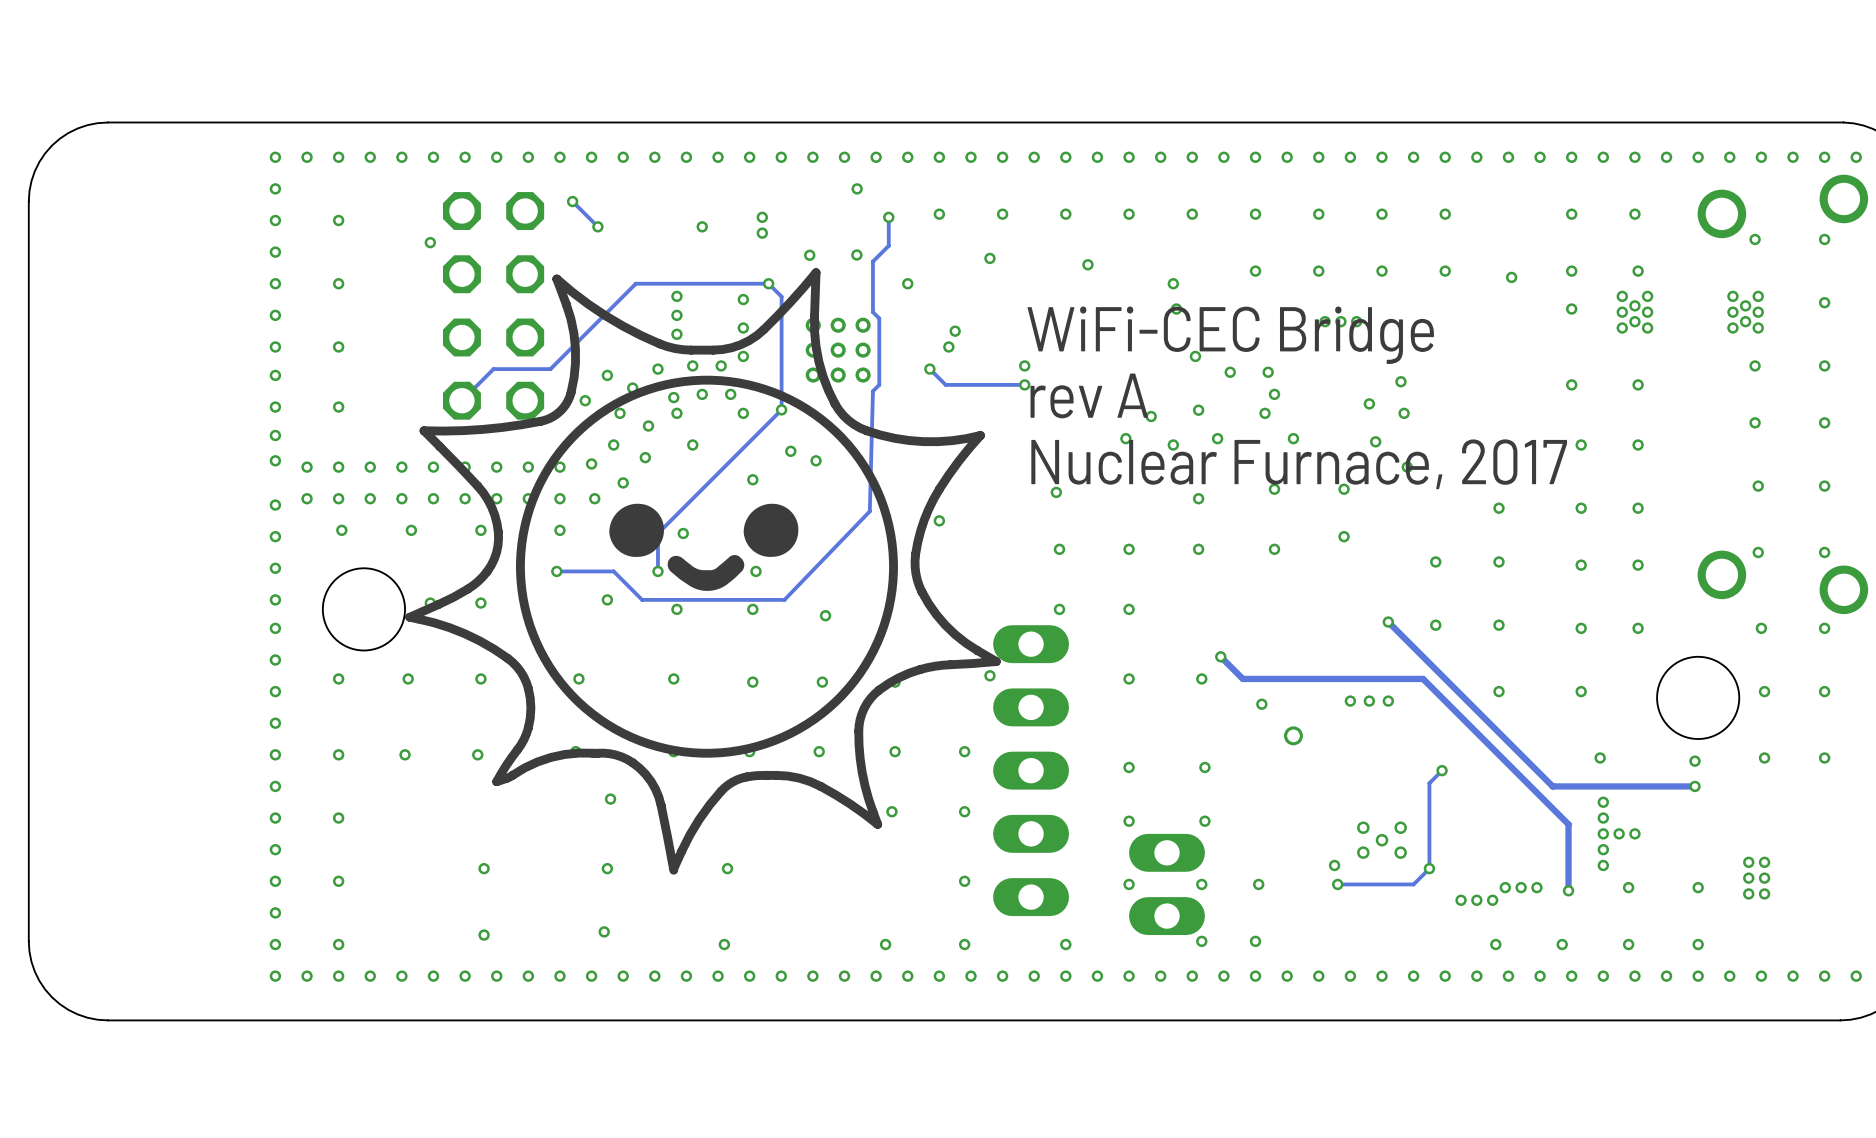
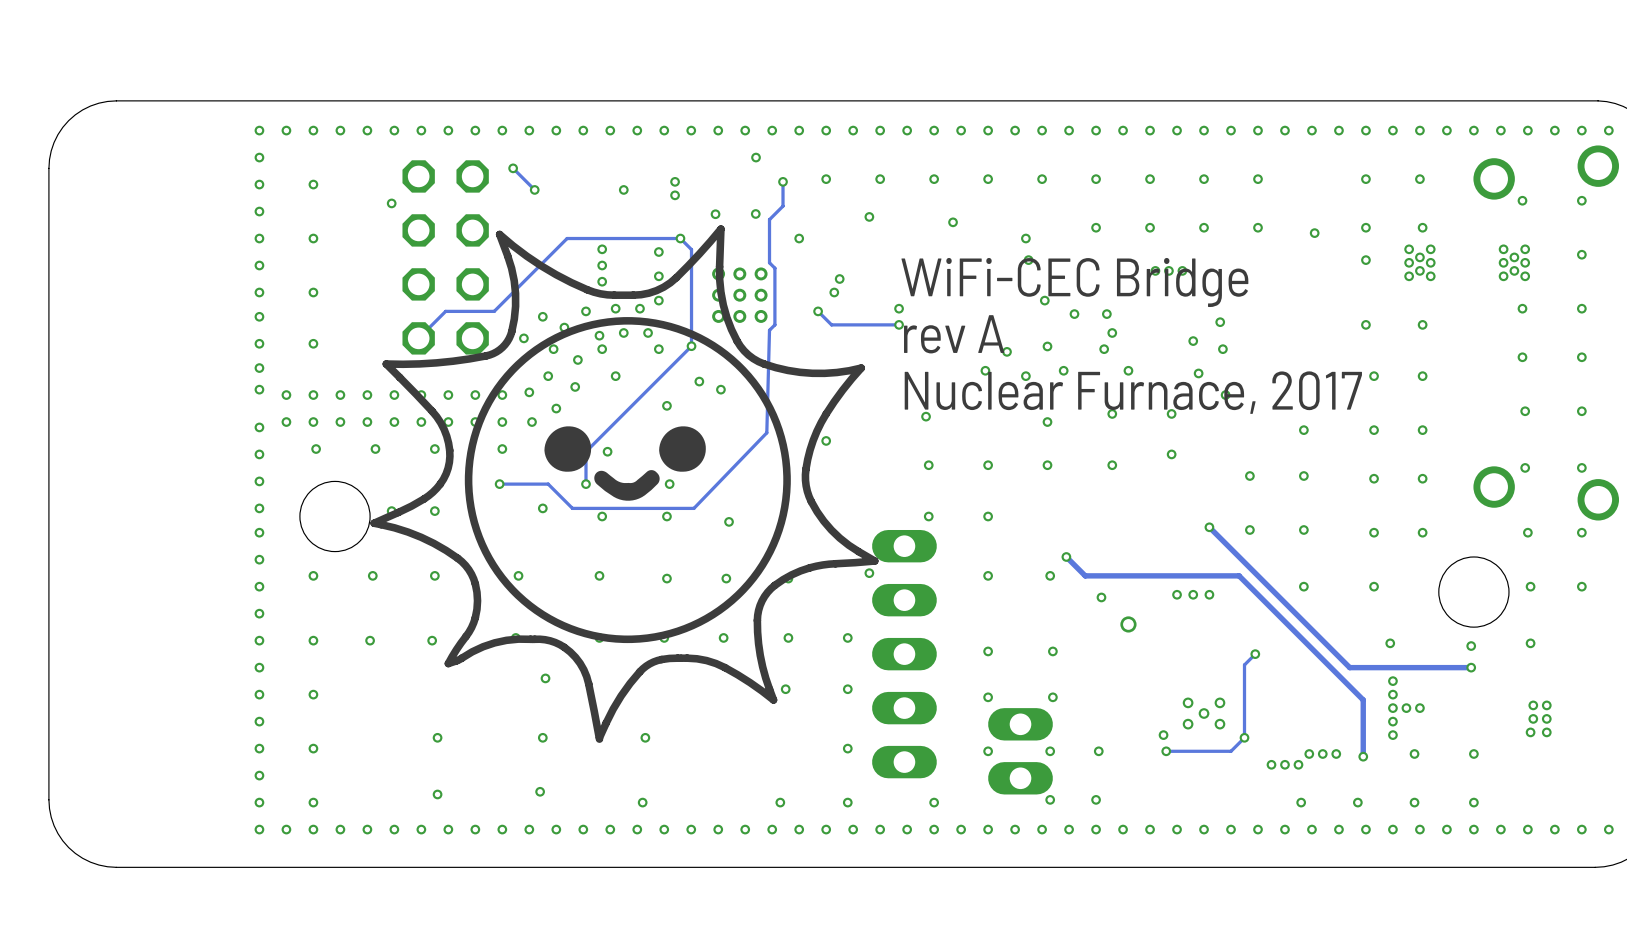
via: (1824, 757) -> none
via: none -> (1533, 705)
via: none -> (1546, 705)
via: none -> (1533, 718)
via: none -> (1546, 718)
via: (1748, 862) -> none
via: none -> (1546, 732)
via: (1748, 878) -> none
via: (1764, 878) -> none
via: (1748, 893) -> none
via: (1764, 893) -> none

